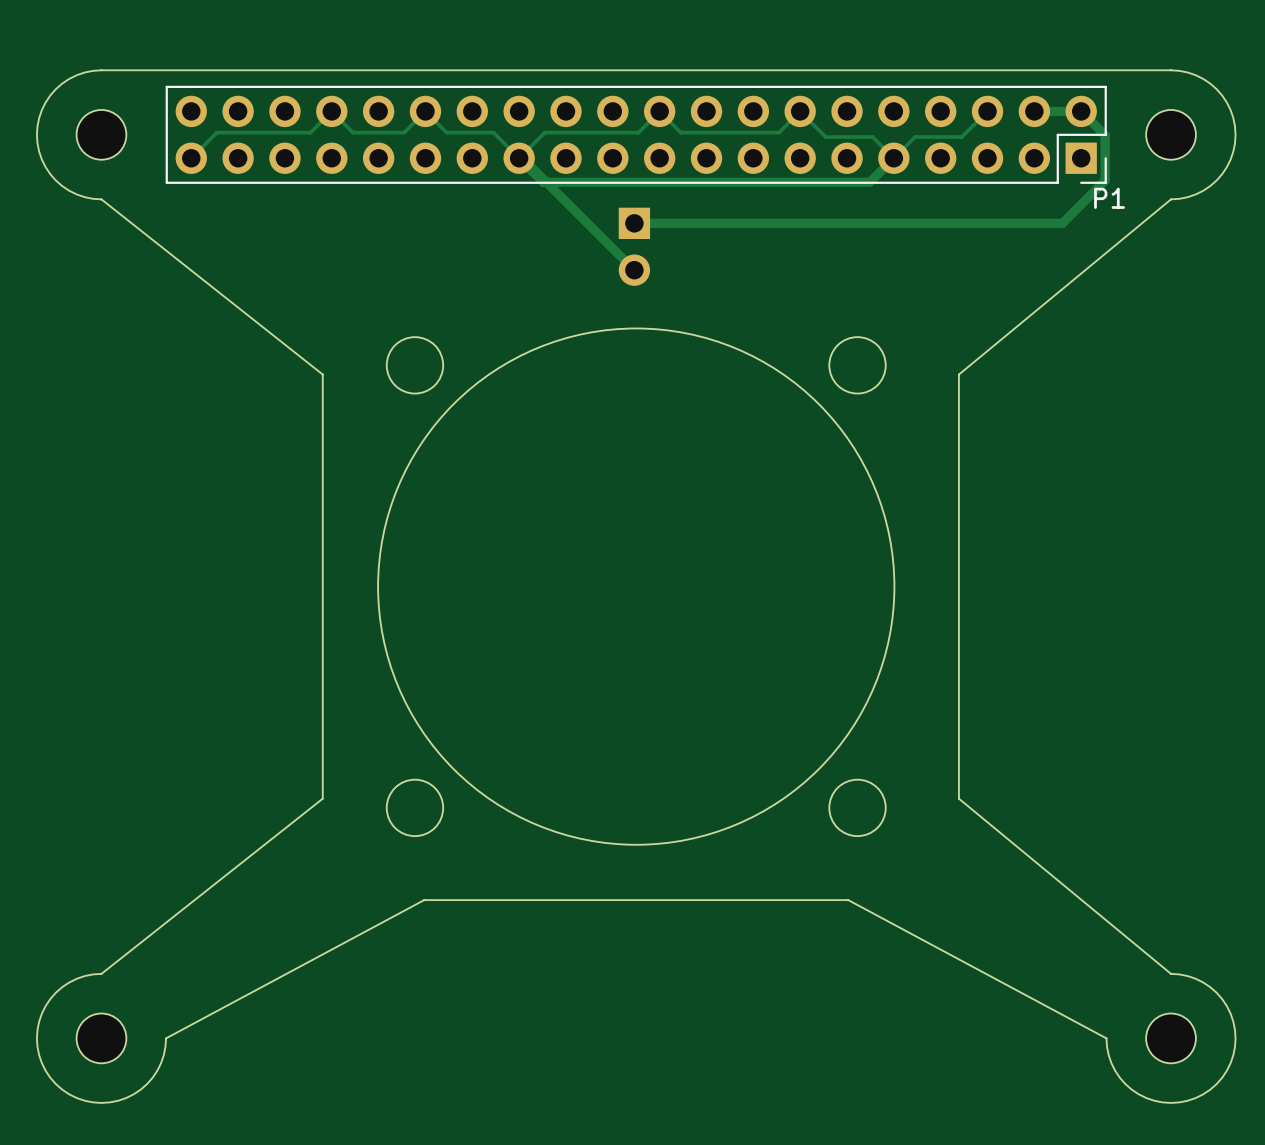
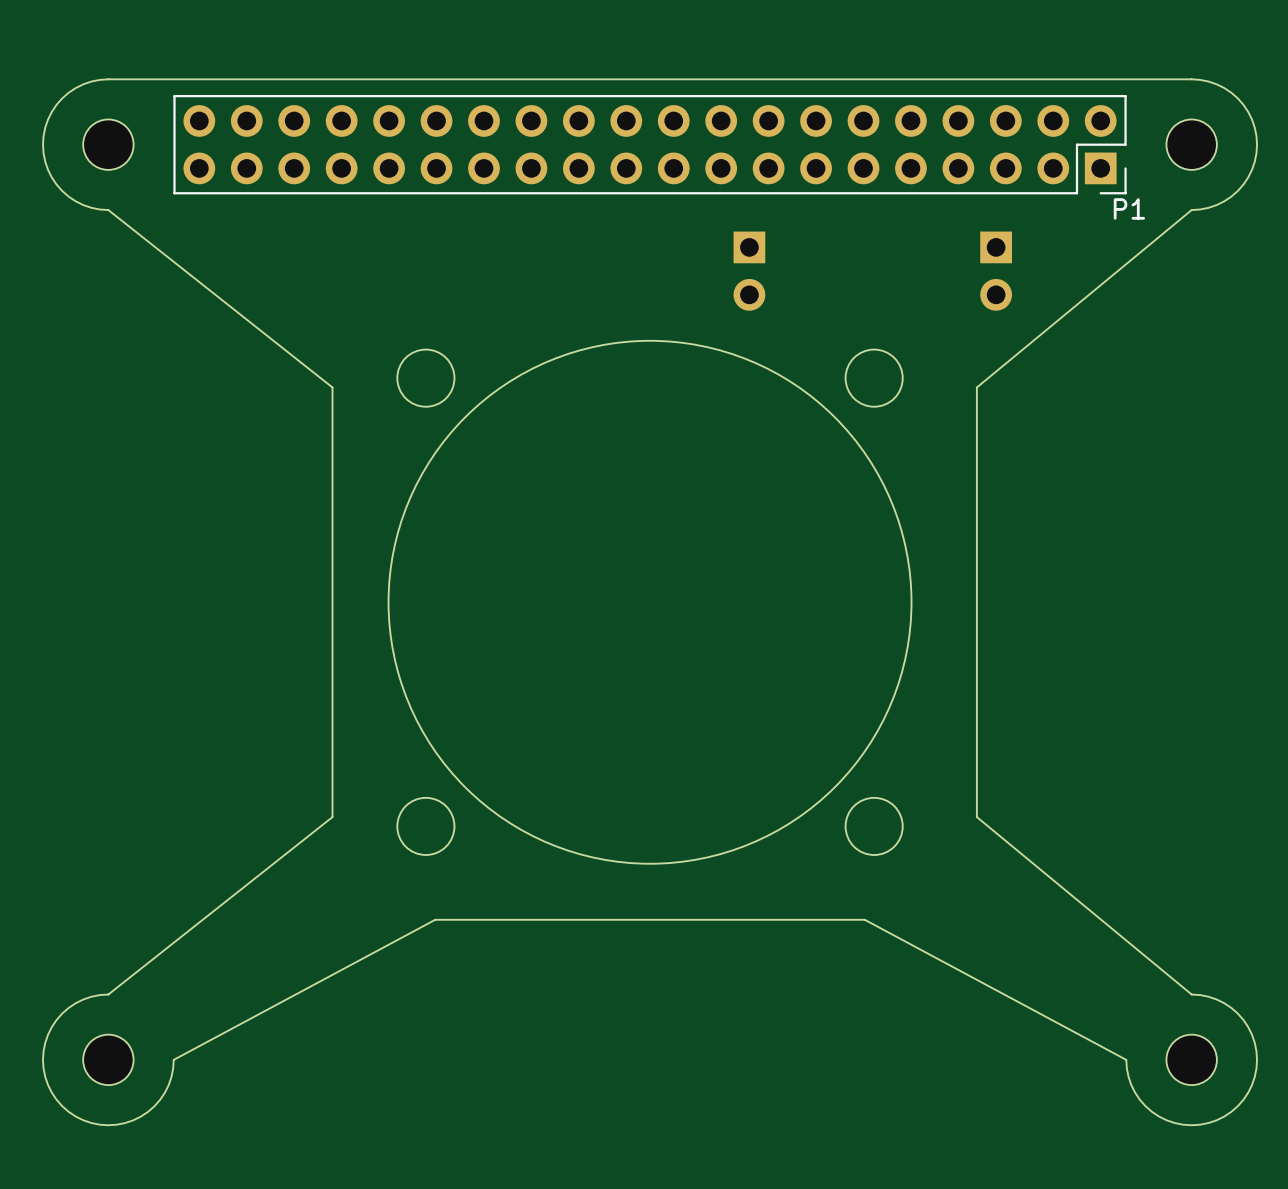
track: (987, 111) (961, 137) (915, 137) (893, 158) -> none
track: (1034, 111) (1081, 111) (1105, 135) (1105, 180) (1062, 223) (634, 223) -> none
track: (519, 158) (522, 158) (634, 270) -> none
track: (519, 158) (493, 132) (446, 132) (425, 111) (404, 132) (353, 132) (331, 111) (310, 132) (216, 132) (191, 158) -> none
track: (893, 158) (869, 182) (543, 182) (519, 158) -> none
track: (893, 158) (872, 137) (825, 137) (800, 111) (778, 132) (680, 132) (659, 111) (638, 132) (544, 132) (519, 158) -> none
part position: (634, 246) -> (749, 271)
part: none -> (996, 271)

